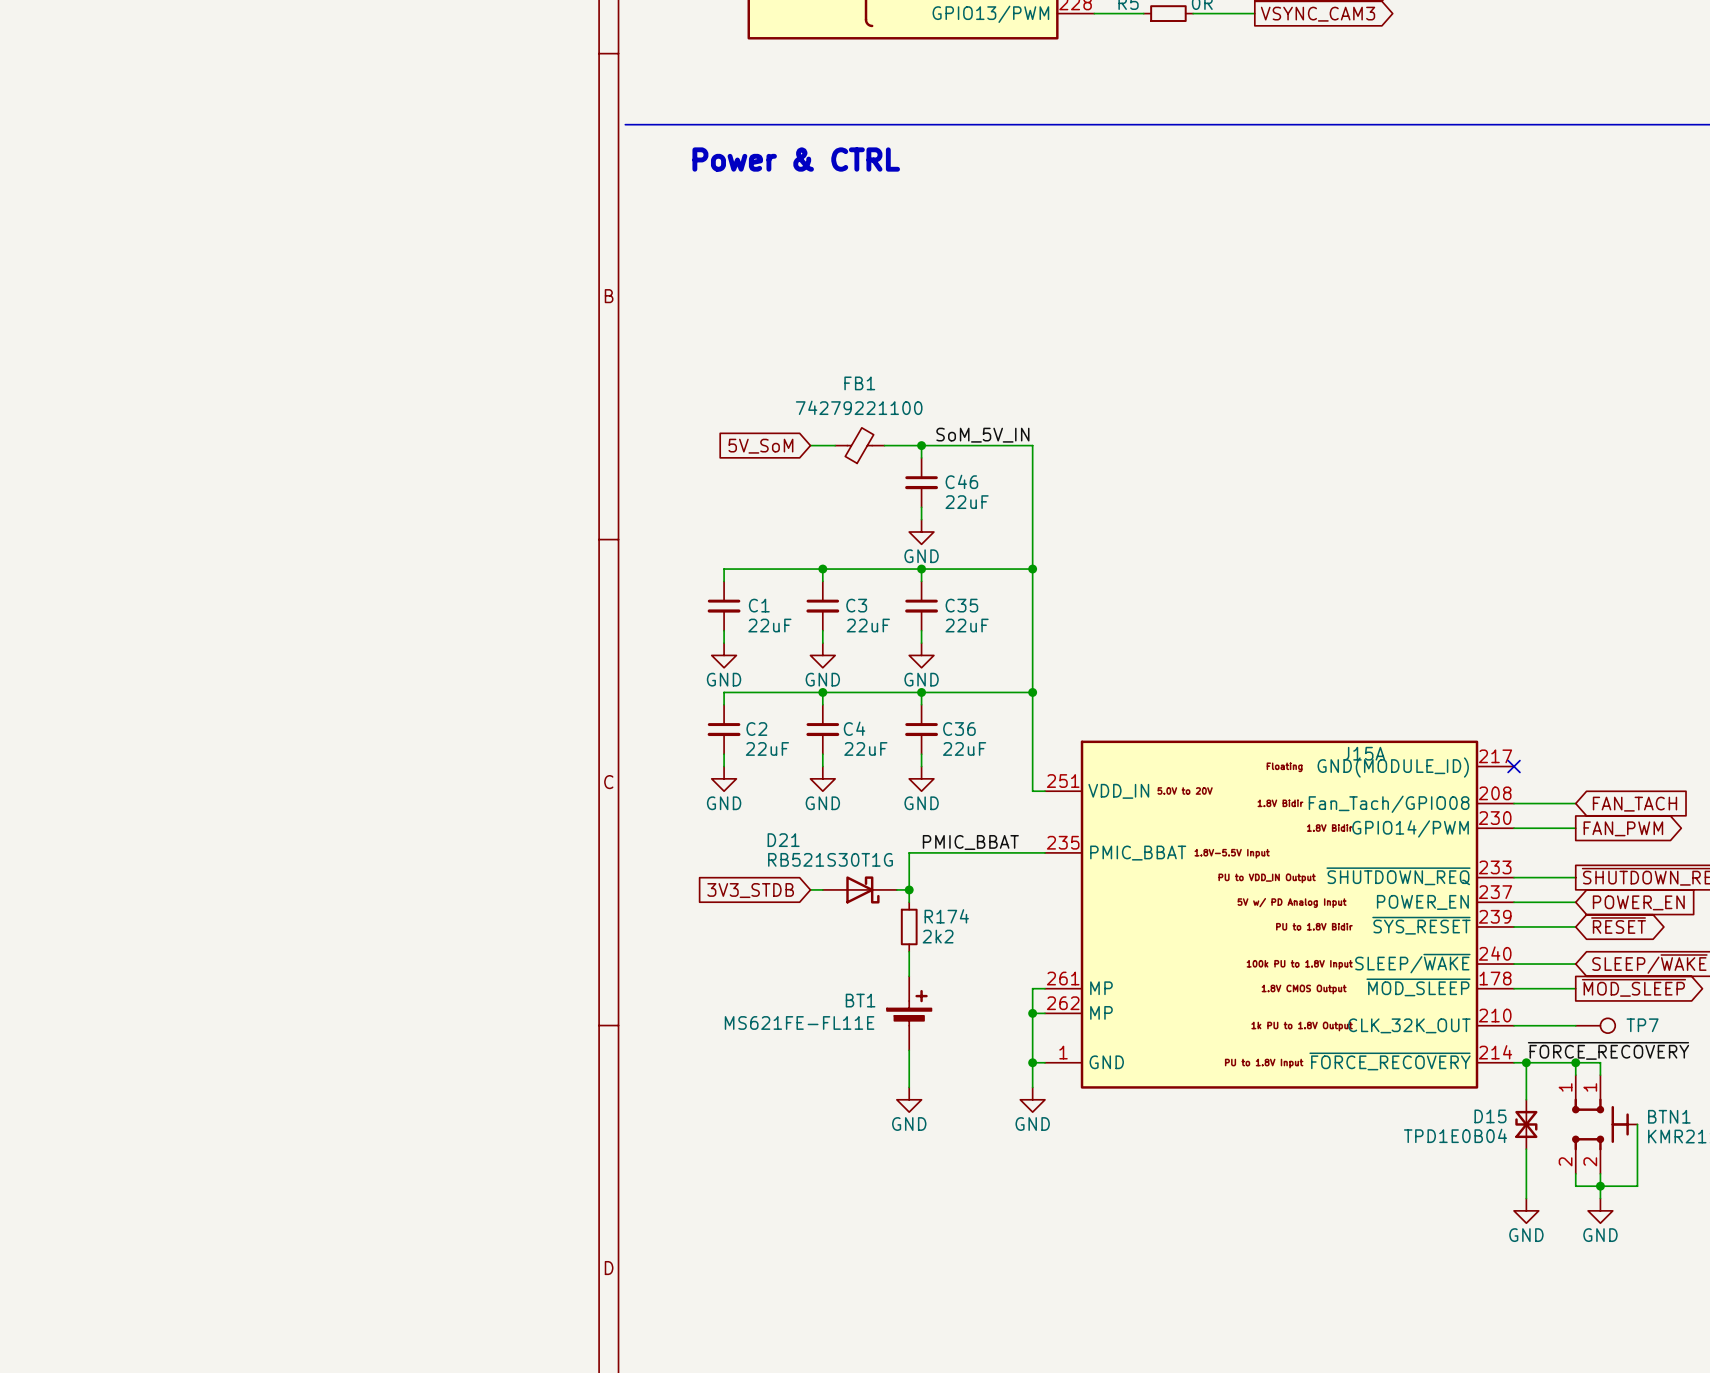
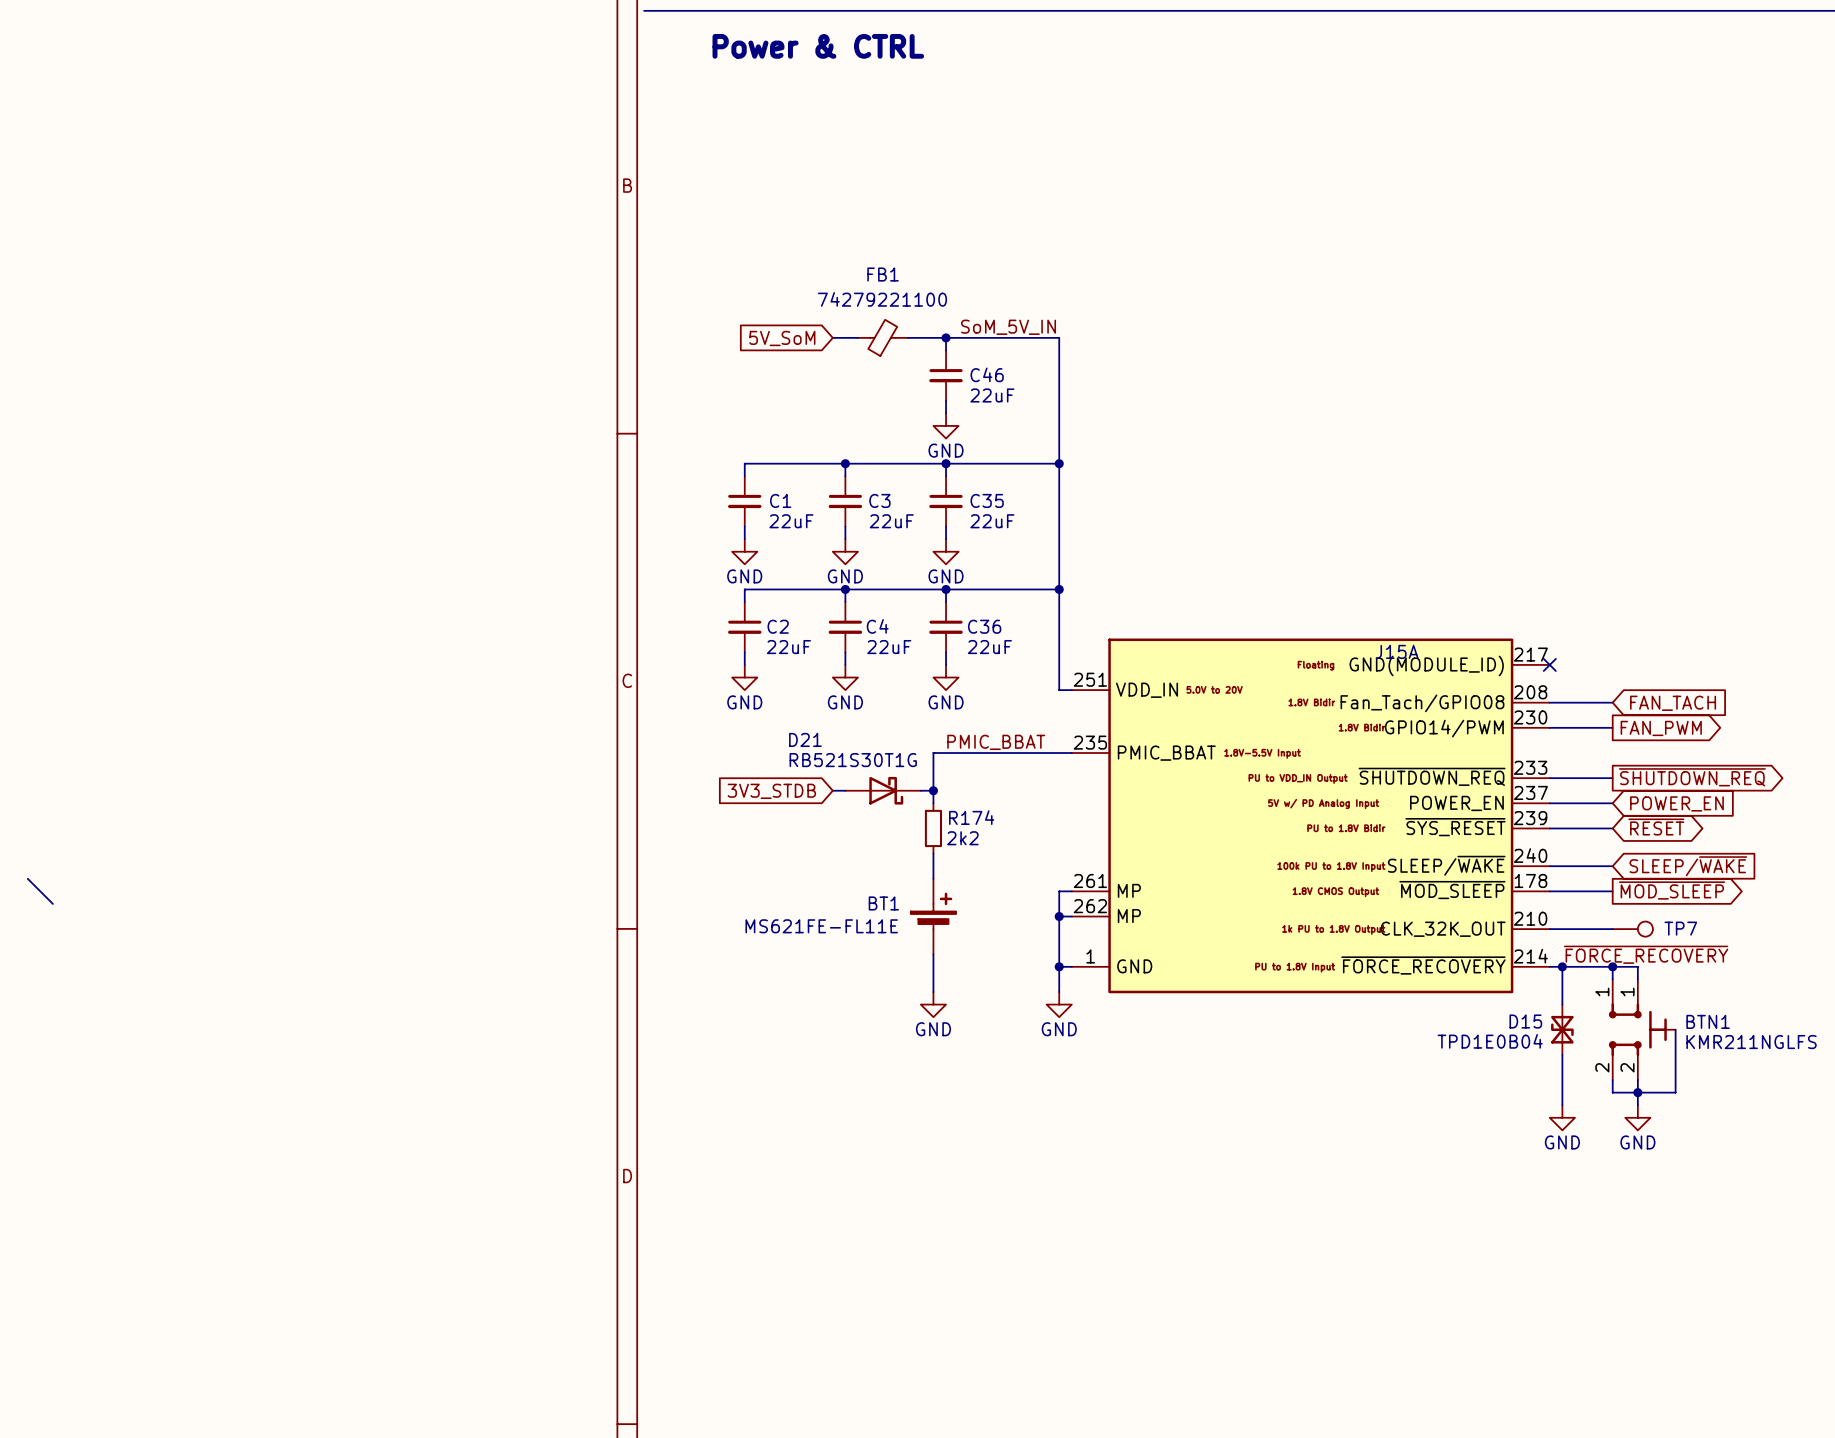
wire: none -> (27, 878) (52, 903)

